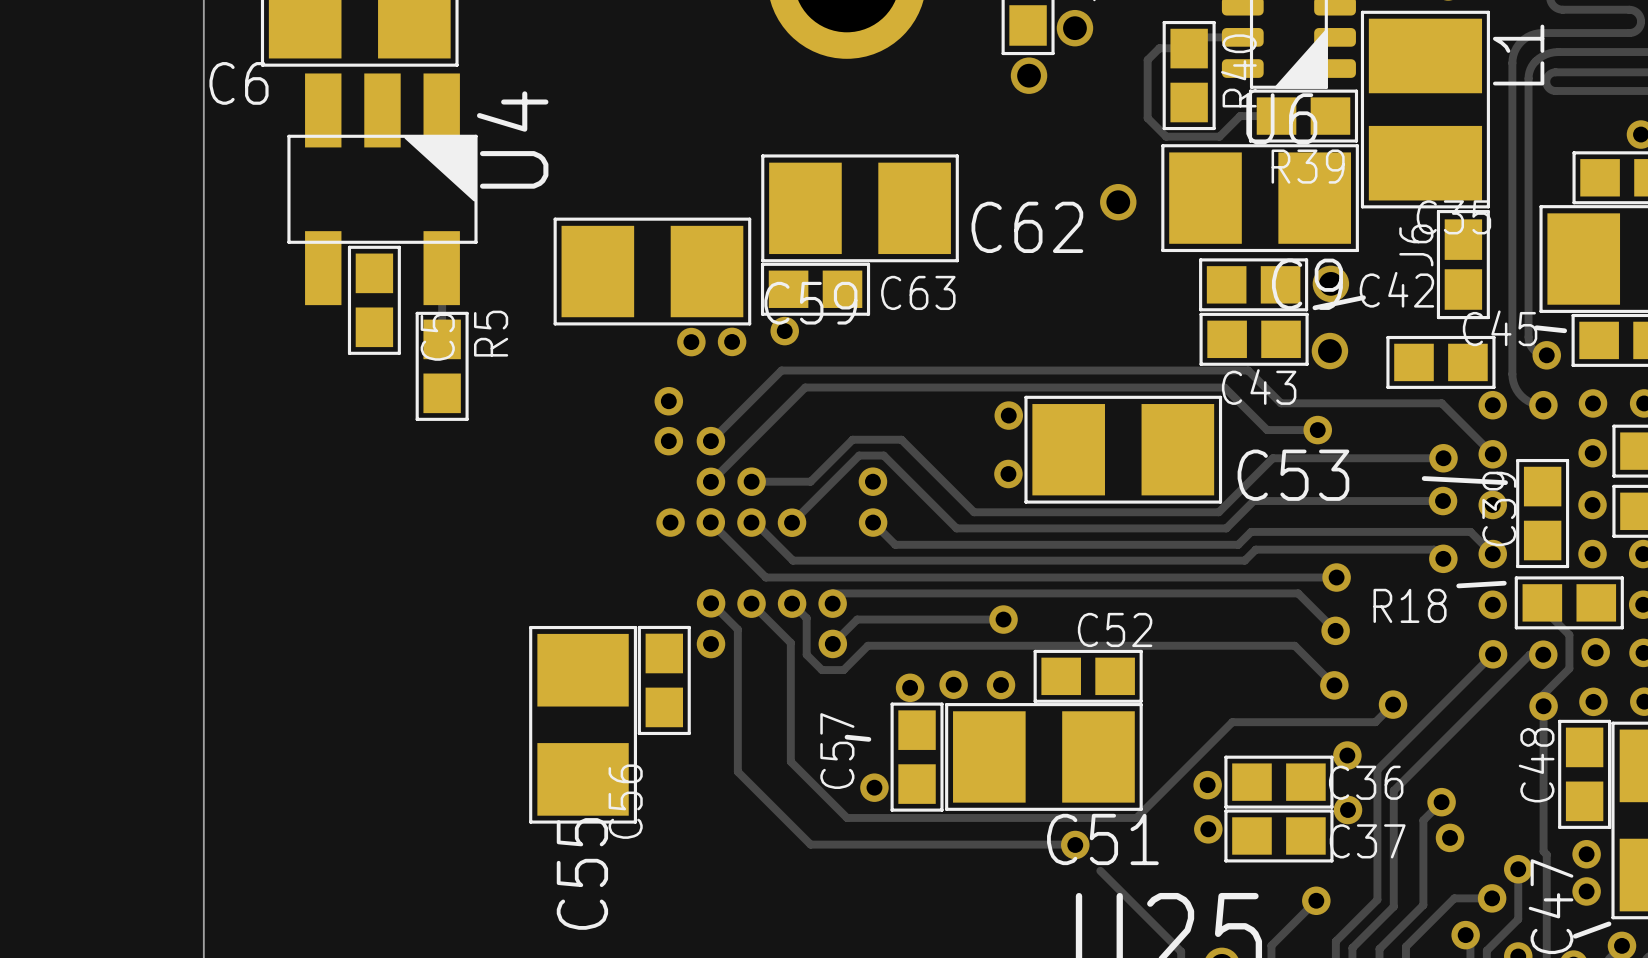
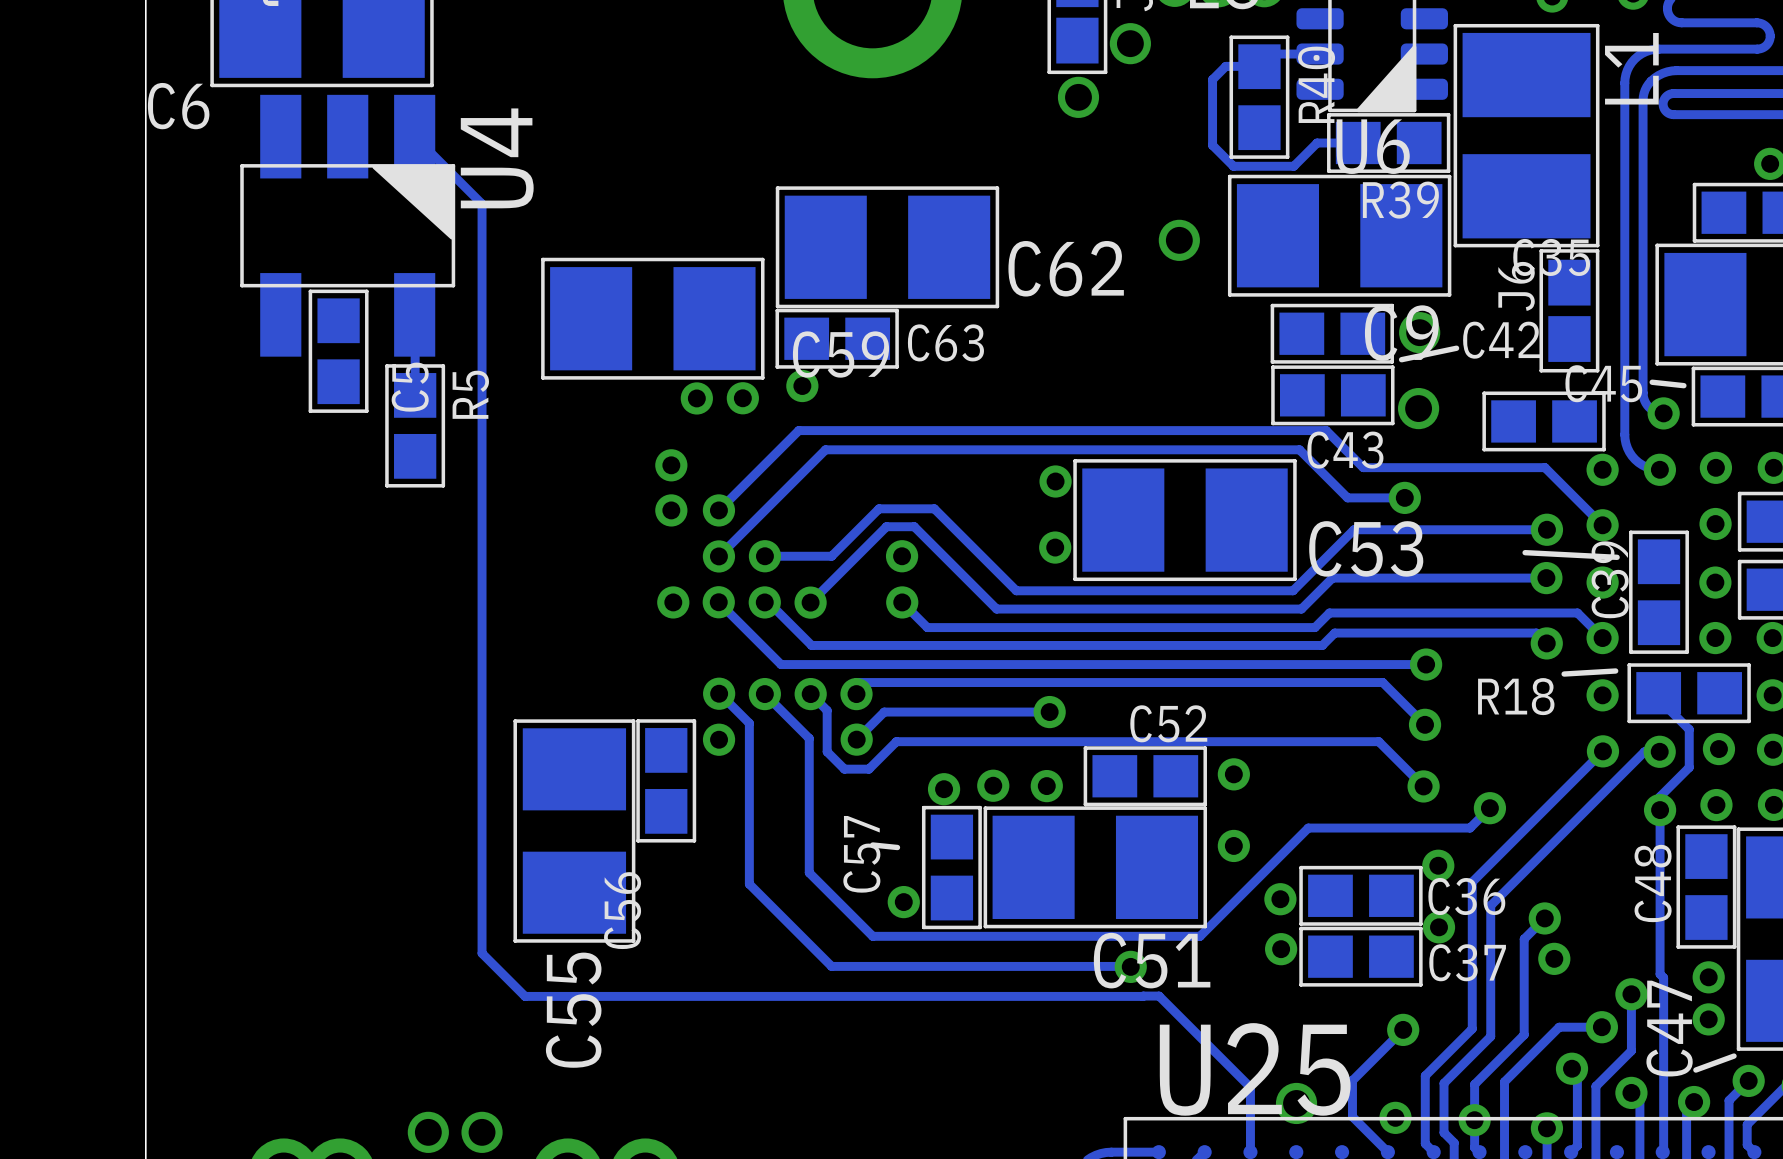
track: none -> (414, 136) (482, 204) (482, 953) (525, 996) (1159, 996)
via: none -> (1233, 774)
via: none -> (1233, 845)

